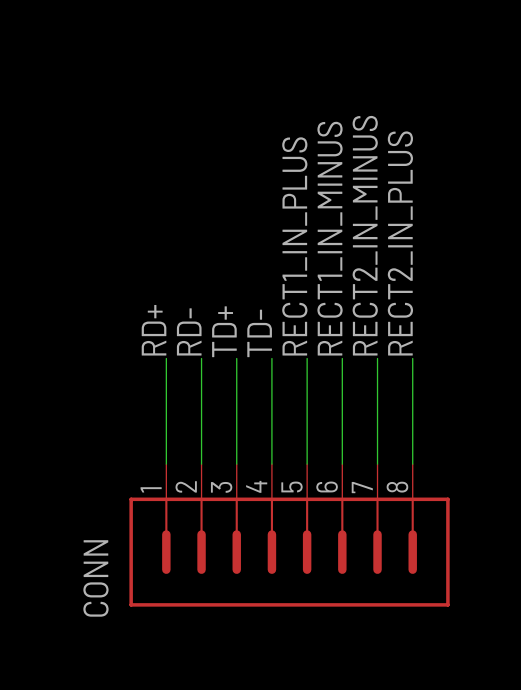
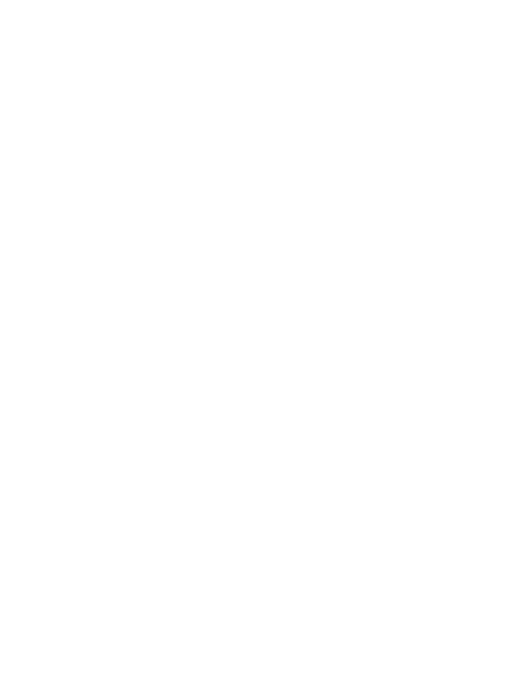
label: RECT2_IN_MINUS (365, 235) -> none
label: RECT1_IN_MINUS (330, 238) -> none
label: RECT2_IN_PLUS (400, 243) -> none
label: RECT1_IN_PLUS (294, 246) -> none
label: RD+ (154, 330) -> none
label: RD- (189, 331) -> none
label: TD+ (224, 331) -> none
label: TD- (259, 333) -> none
wire: (166, 358) (166, 464) -> none
wire: (201, 358) (201, 464) -> none
wire: (236, 358) (236, 464) -> none
wire: (271, 358) (271, 464) -> none
wire: (307, 358) (307, 464) -> none
wire: (342, 358) (342, 464) -> none
wire: (377, 358) (377, 464) -> none
wire: (412, 358) (412, 464) -> none
CONN: (289, 535) -> none

